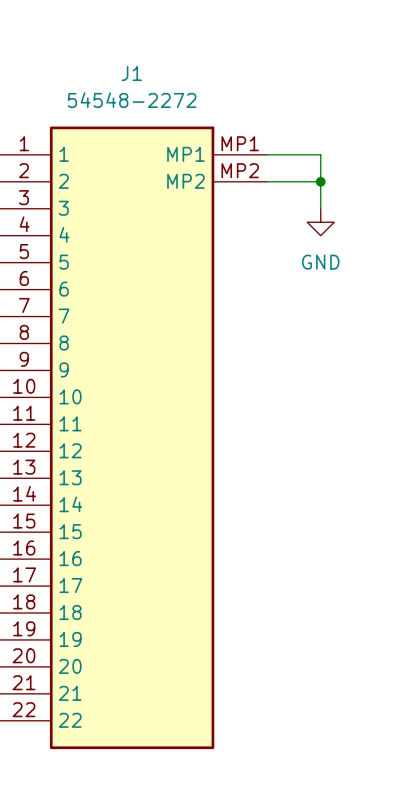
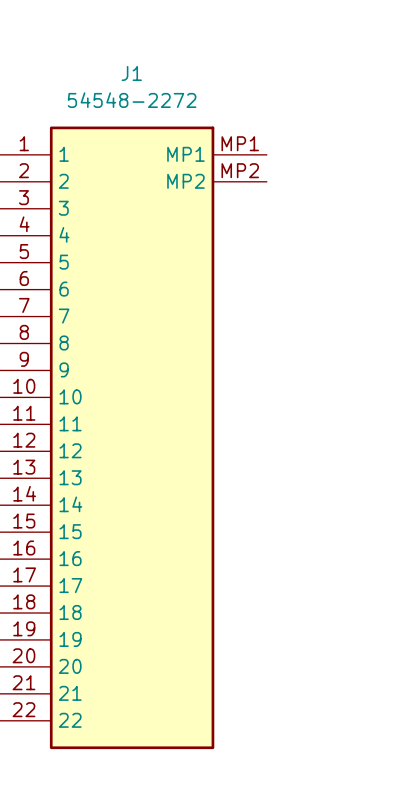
wire: (266, 154) (320, 154) (320, 208) -> none
wire: (266, 181) (320, 181) -> none
junction: (320, 181) -> none
power symbol: GND (320, 222) -> none

